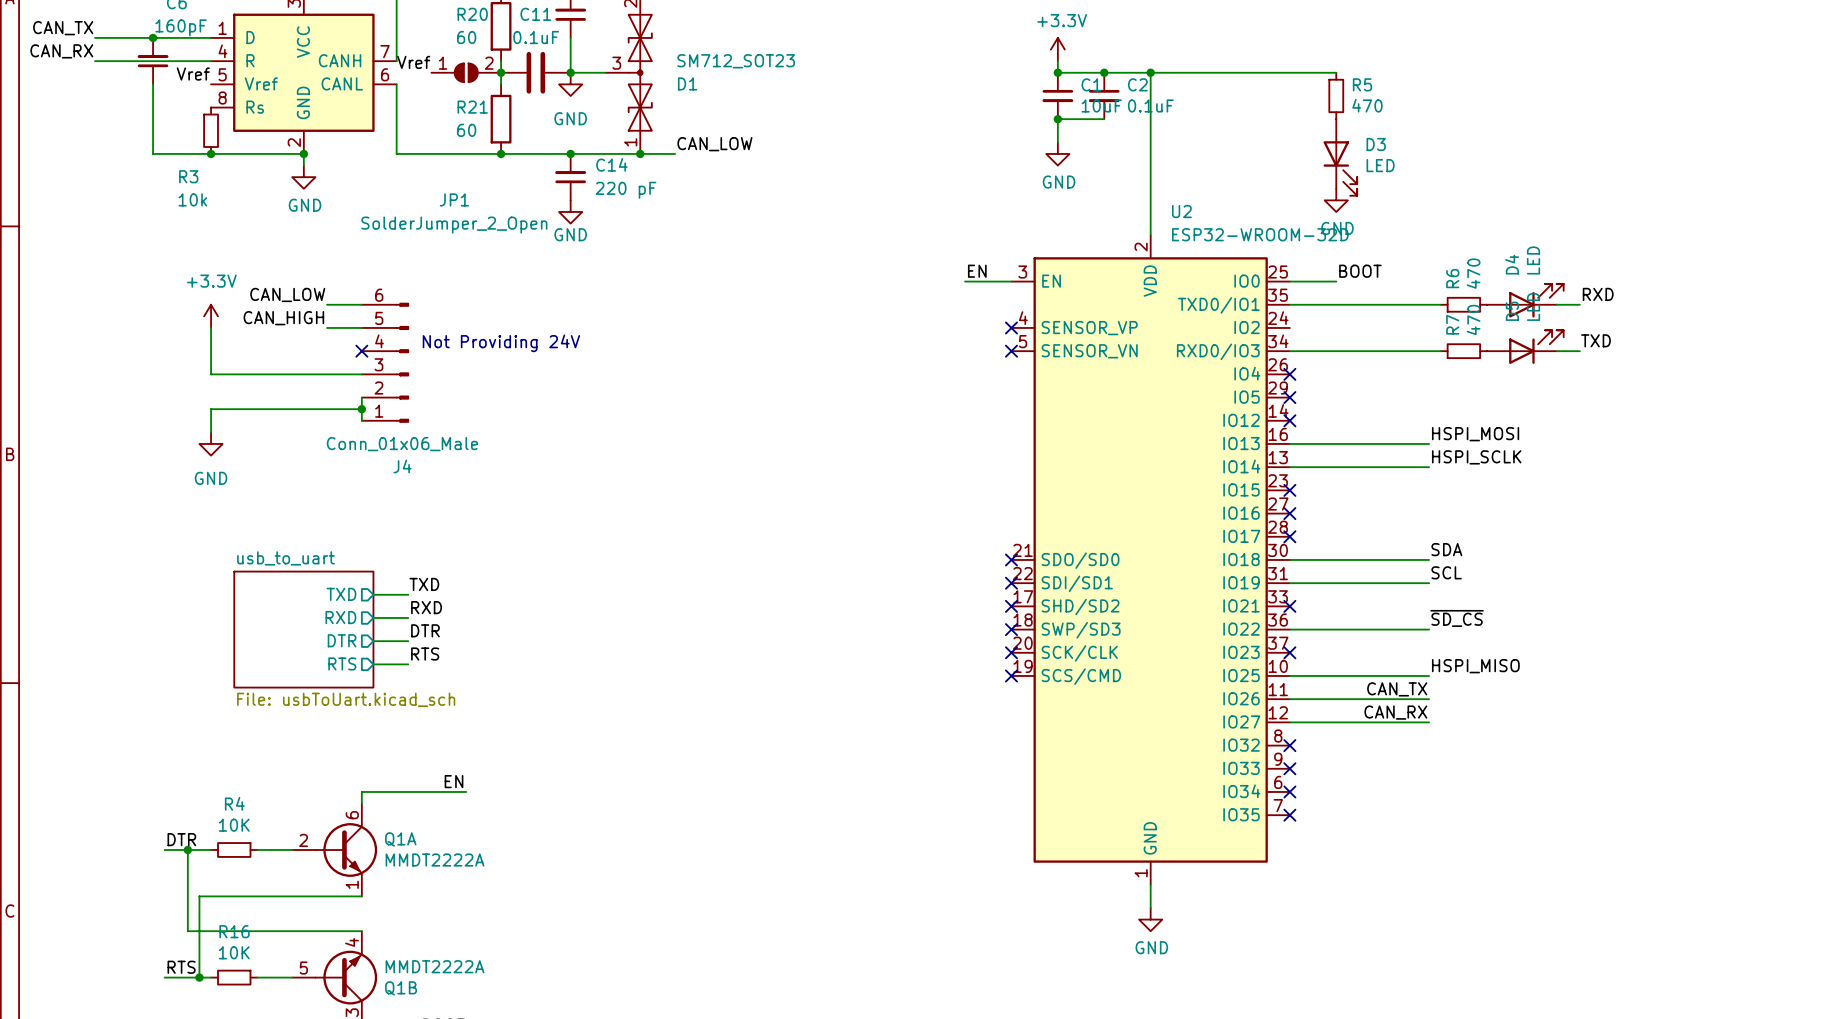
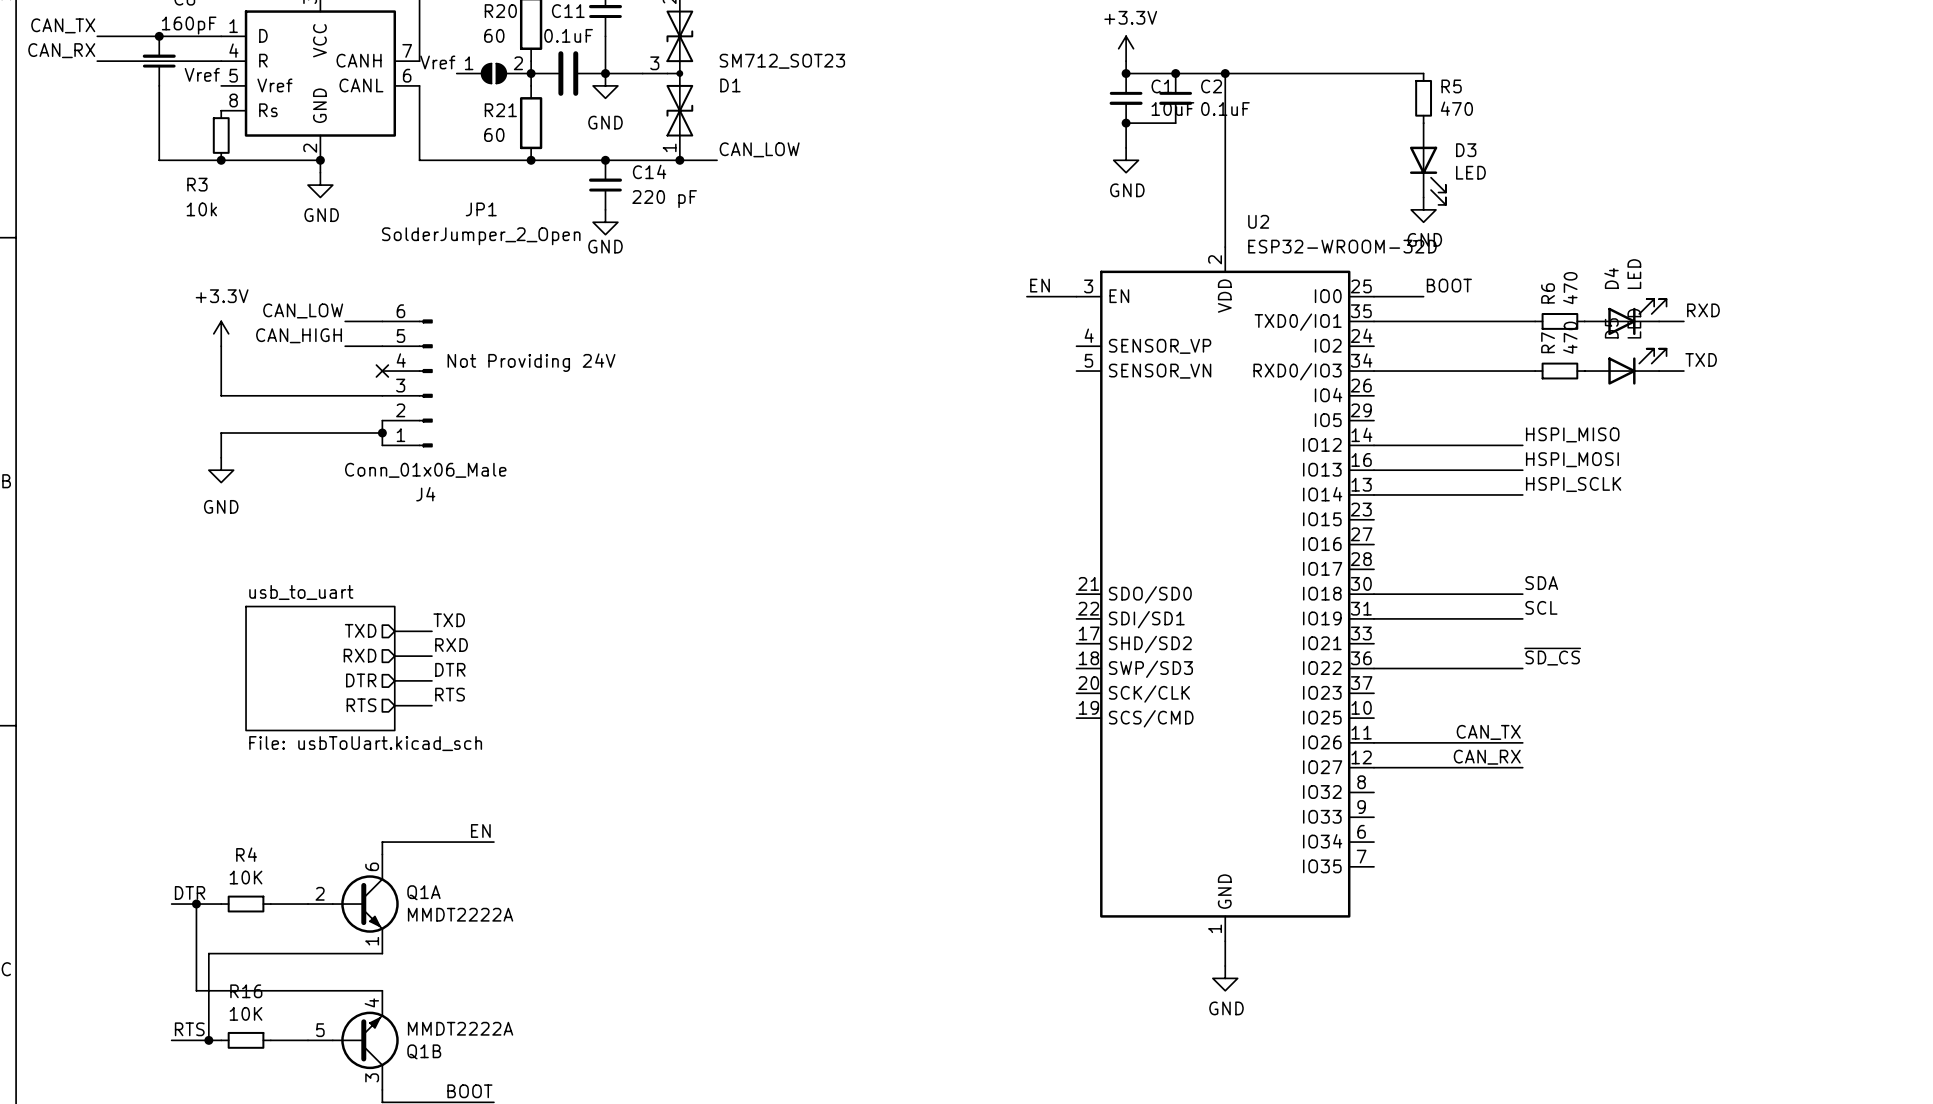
no-connect mark: (1011, 327) -> none
no-connect mark: (1011, 351) -> none
no-connect mark: (1289, 374) -> none
no-connect mark: (1289, 397) -> none
label: none -> HSPI_MISO (1572, 434)
wire: none -> (1374, 445) (1522, 445)
no-connect mark: (1289, 420) -> none
no-connect mark: (1289, 490) -> none
no-connect mark: (1289, 513) -> none
no-connect mark: (1289, 536) -> none
no-connect mark: (1011, 559) -> none
no-connect mark: (1011, 583) -> none
no-connect mark: (1011, 606) -> none
no-connect mark: (1289, 606) -> none
no-connect mark: (1011, 629) -> none
no-connect mark: (1011, 652) -> none
no-connect mark: (1289, 652) -> none
label: HSPI_MISO (1475, 666) -> none
no-connect mark: (1011, 675) -> none
wire: (1289, 675) (1429, 675) -> none
no-connect mark: (1289, 745) -> none
no-connect mark: (1289, 768) -> none
no-connect mark: (1289, 791) -> none
no-connect mark: (1289, 815) -> none

